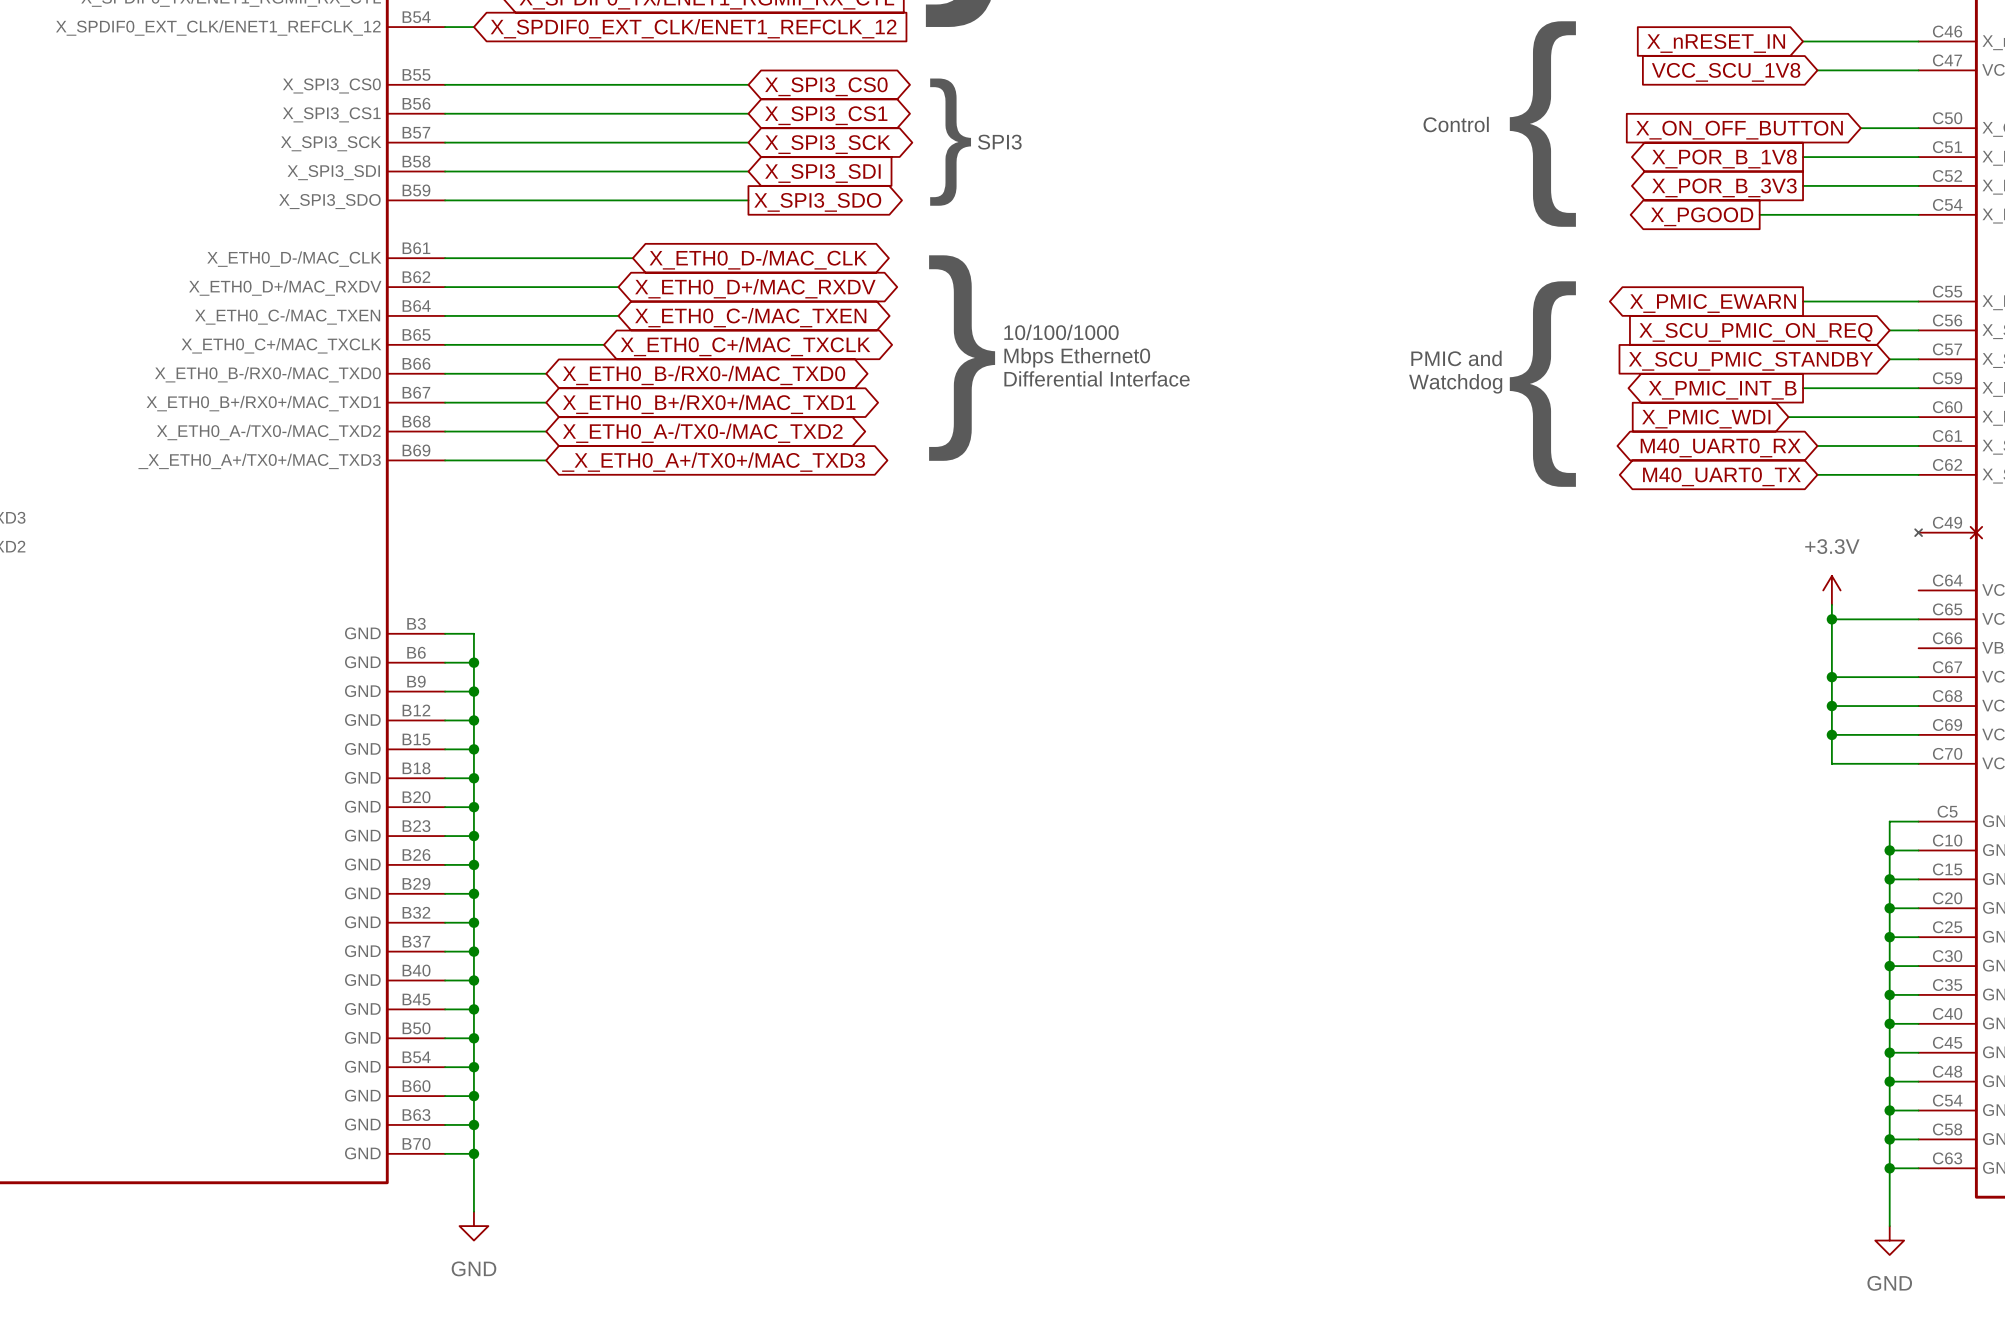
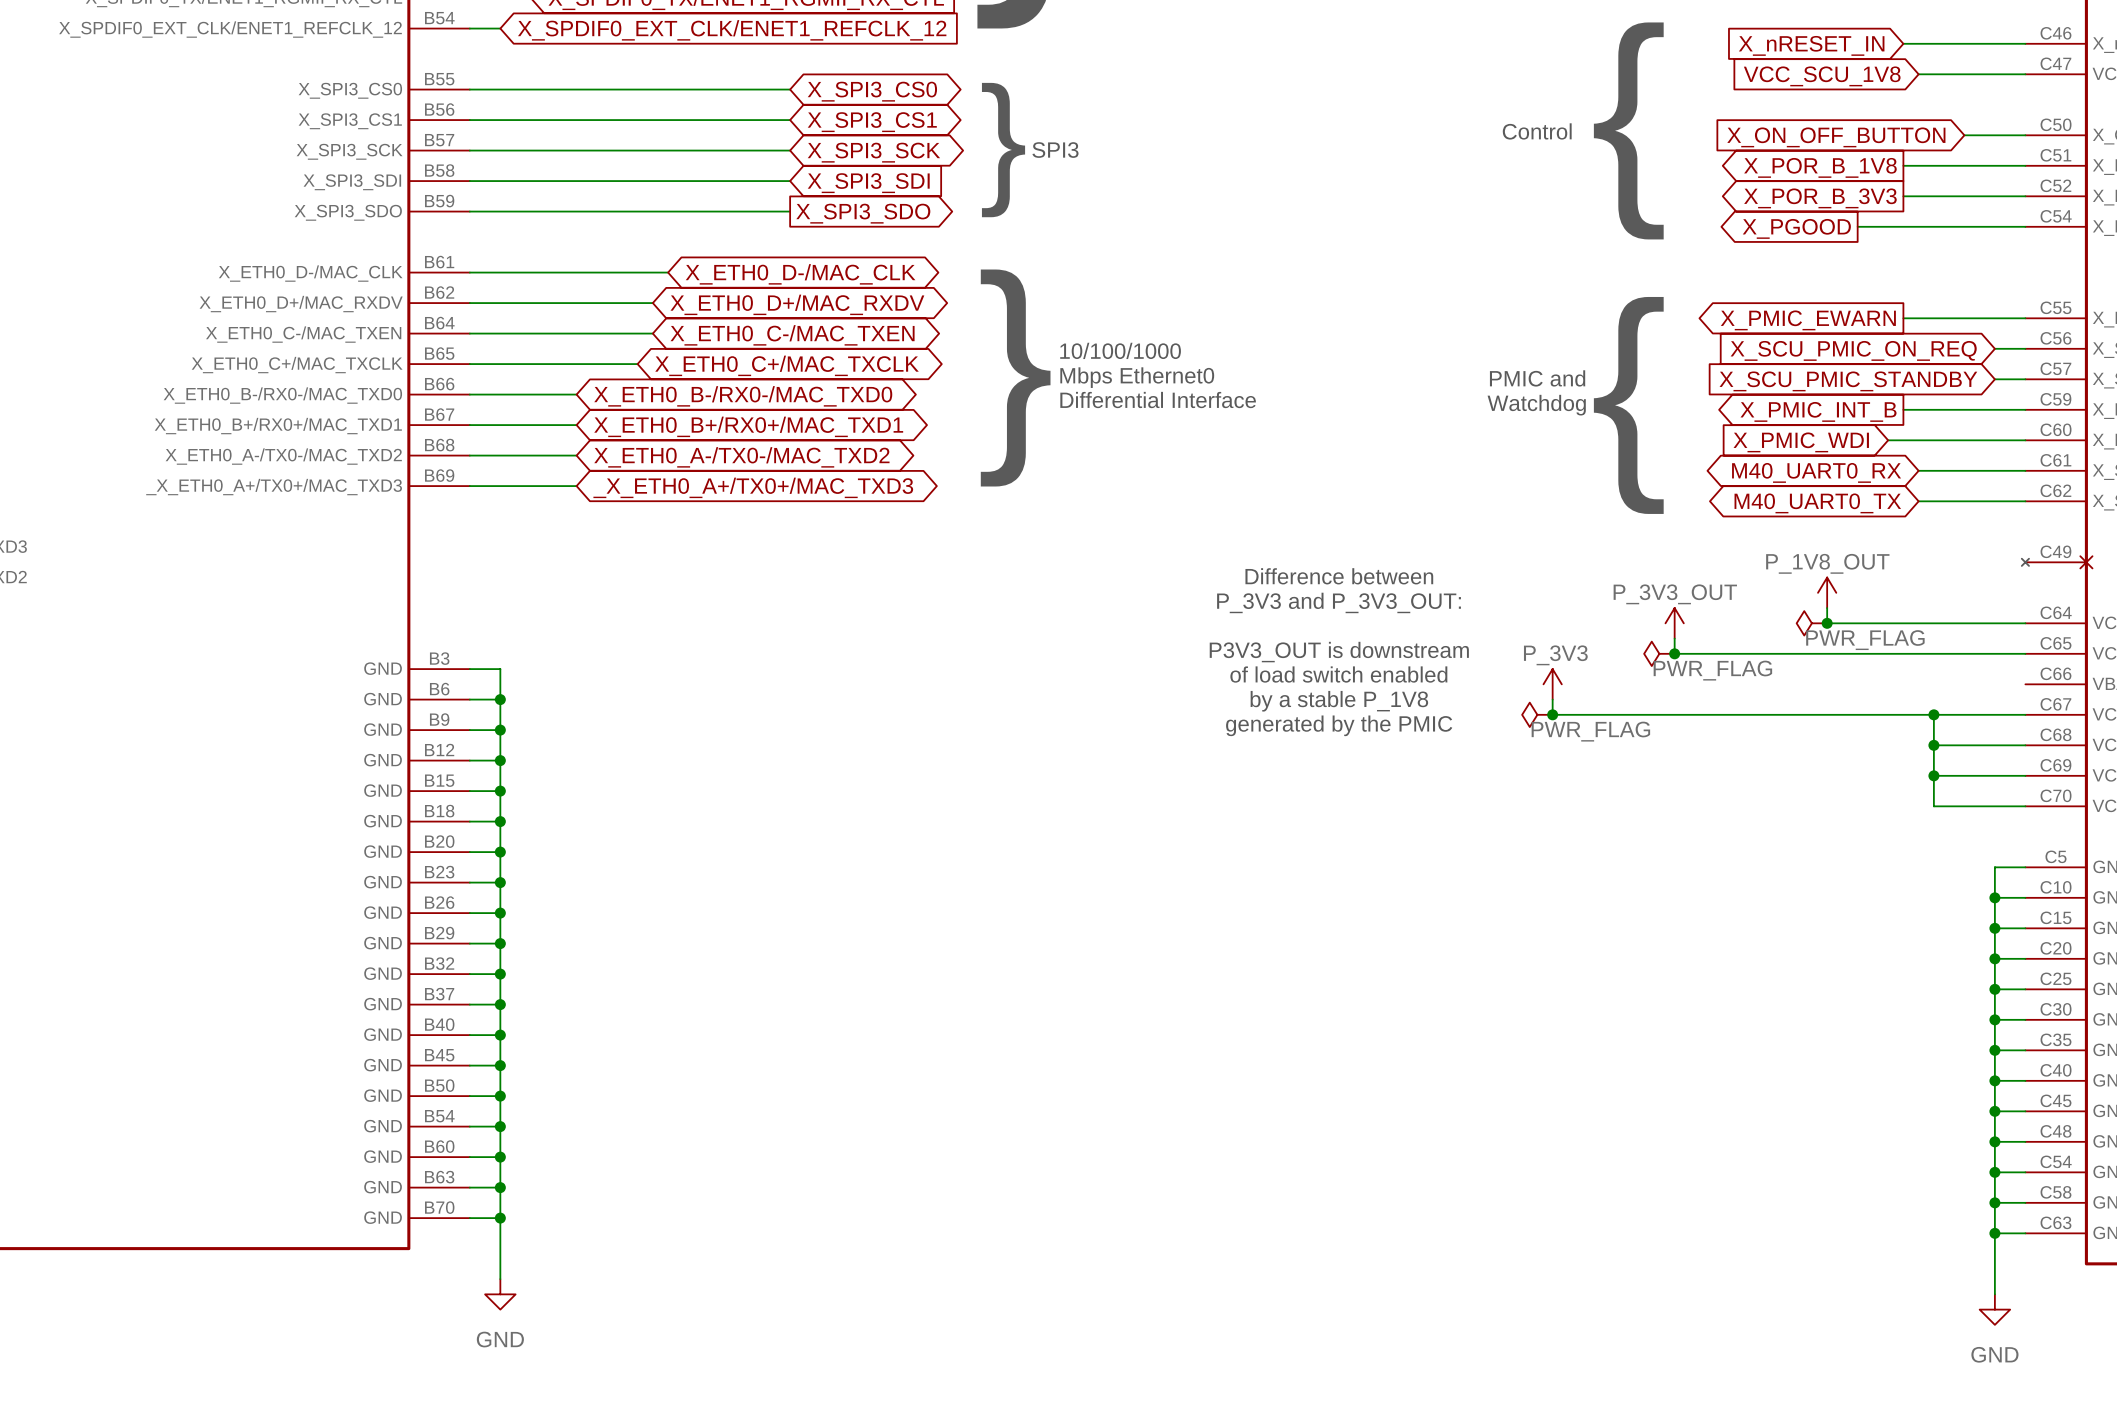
text: none -> Difference between (1339, 576)
power symbol: none -> P_1V8_OUT (1827, 592)
text: none -> P_3V3 and P_3V3_OUT: (1339, 602)
wire: none -> (1827, 608) (1827, 623) (2025, 623)
power symbol: none -> P_3V3_OUT (1674, 623)
power symbol: none -> PWR_FLAG (1811, 623)
junction: none -> (1827, 623)
power symbol: +3.3V (1831, 590) -> none
wire: none -> (1674, 638) (1674, 653) (1933, 653)
wire: (1831, 604) (1831, 677) -> (1552, 699) (1552, 714) (1933, 714)
text: none -> P3V3_OUT is downstream (1339, 652)
power symbol: none -> PWR_FLAG (1659, 653)
junction: none -> (1674, 653)
junction: (1831, 619) -> none
text: none -> of load switch enabled (1338, 674)
power symbol: none -> P_3V3 (1552, 684)
text: none -> by a stable P_1V8 (1339, 701)
power symbol: none -> PWR_FLAG (1537, 714)
junction: none -> (1552, 714)
text: none -> generated by the PMIC (1339, 725)

